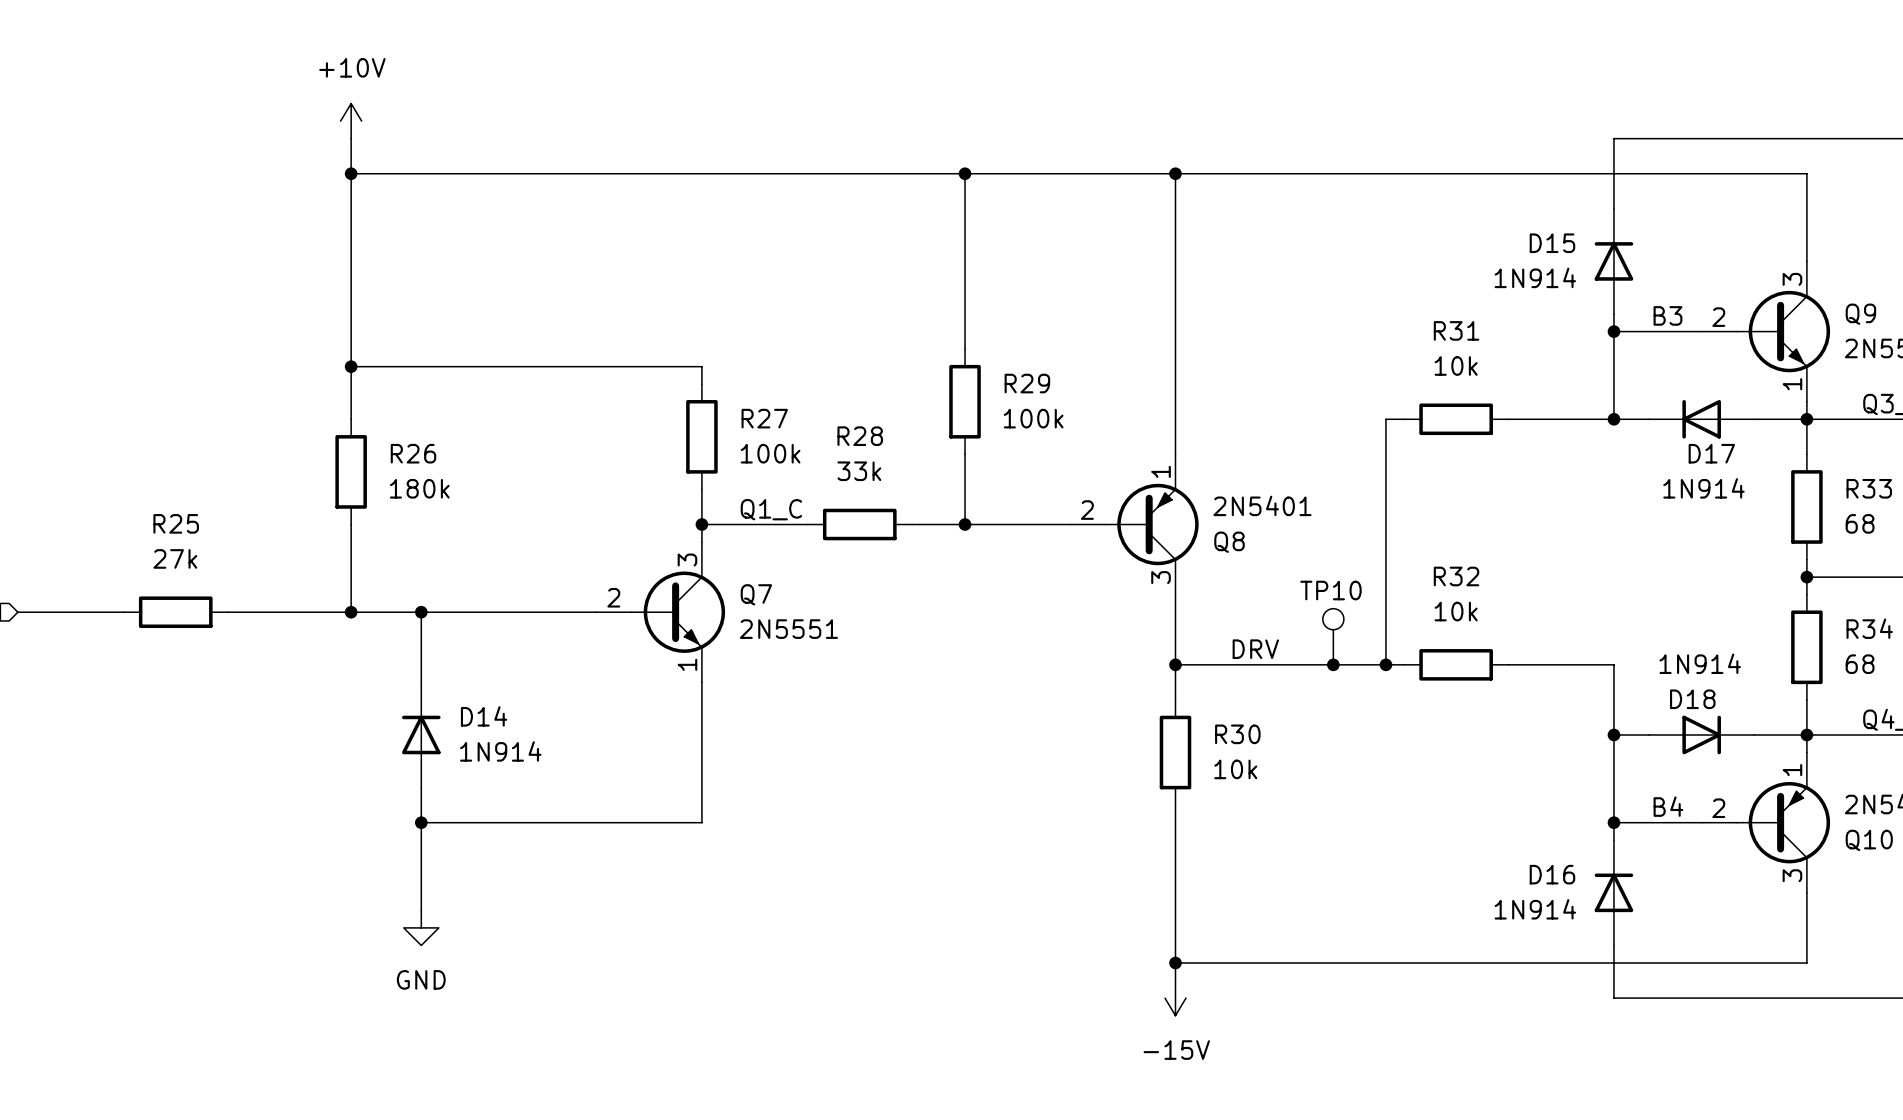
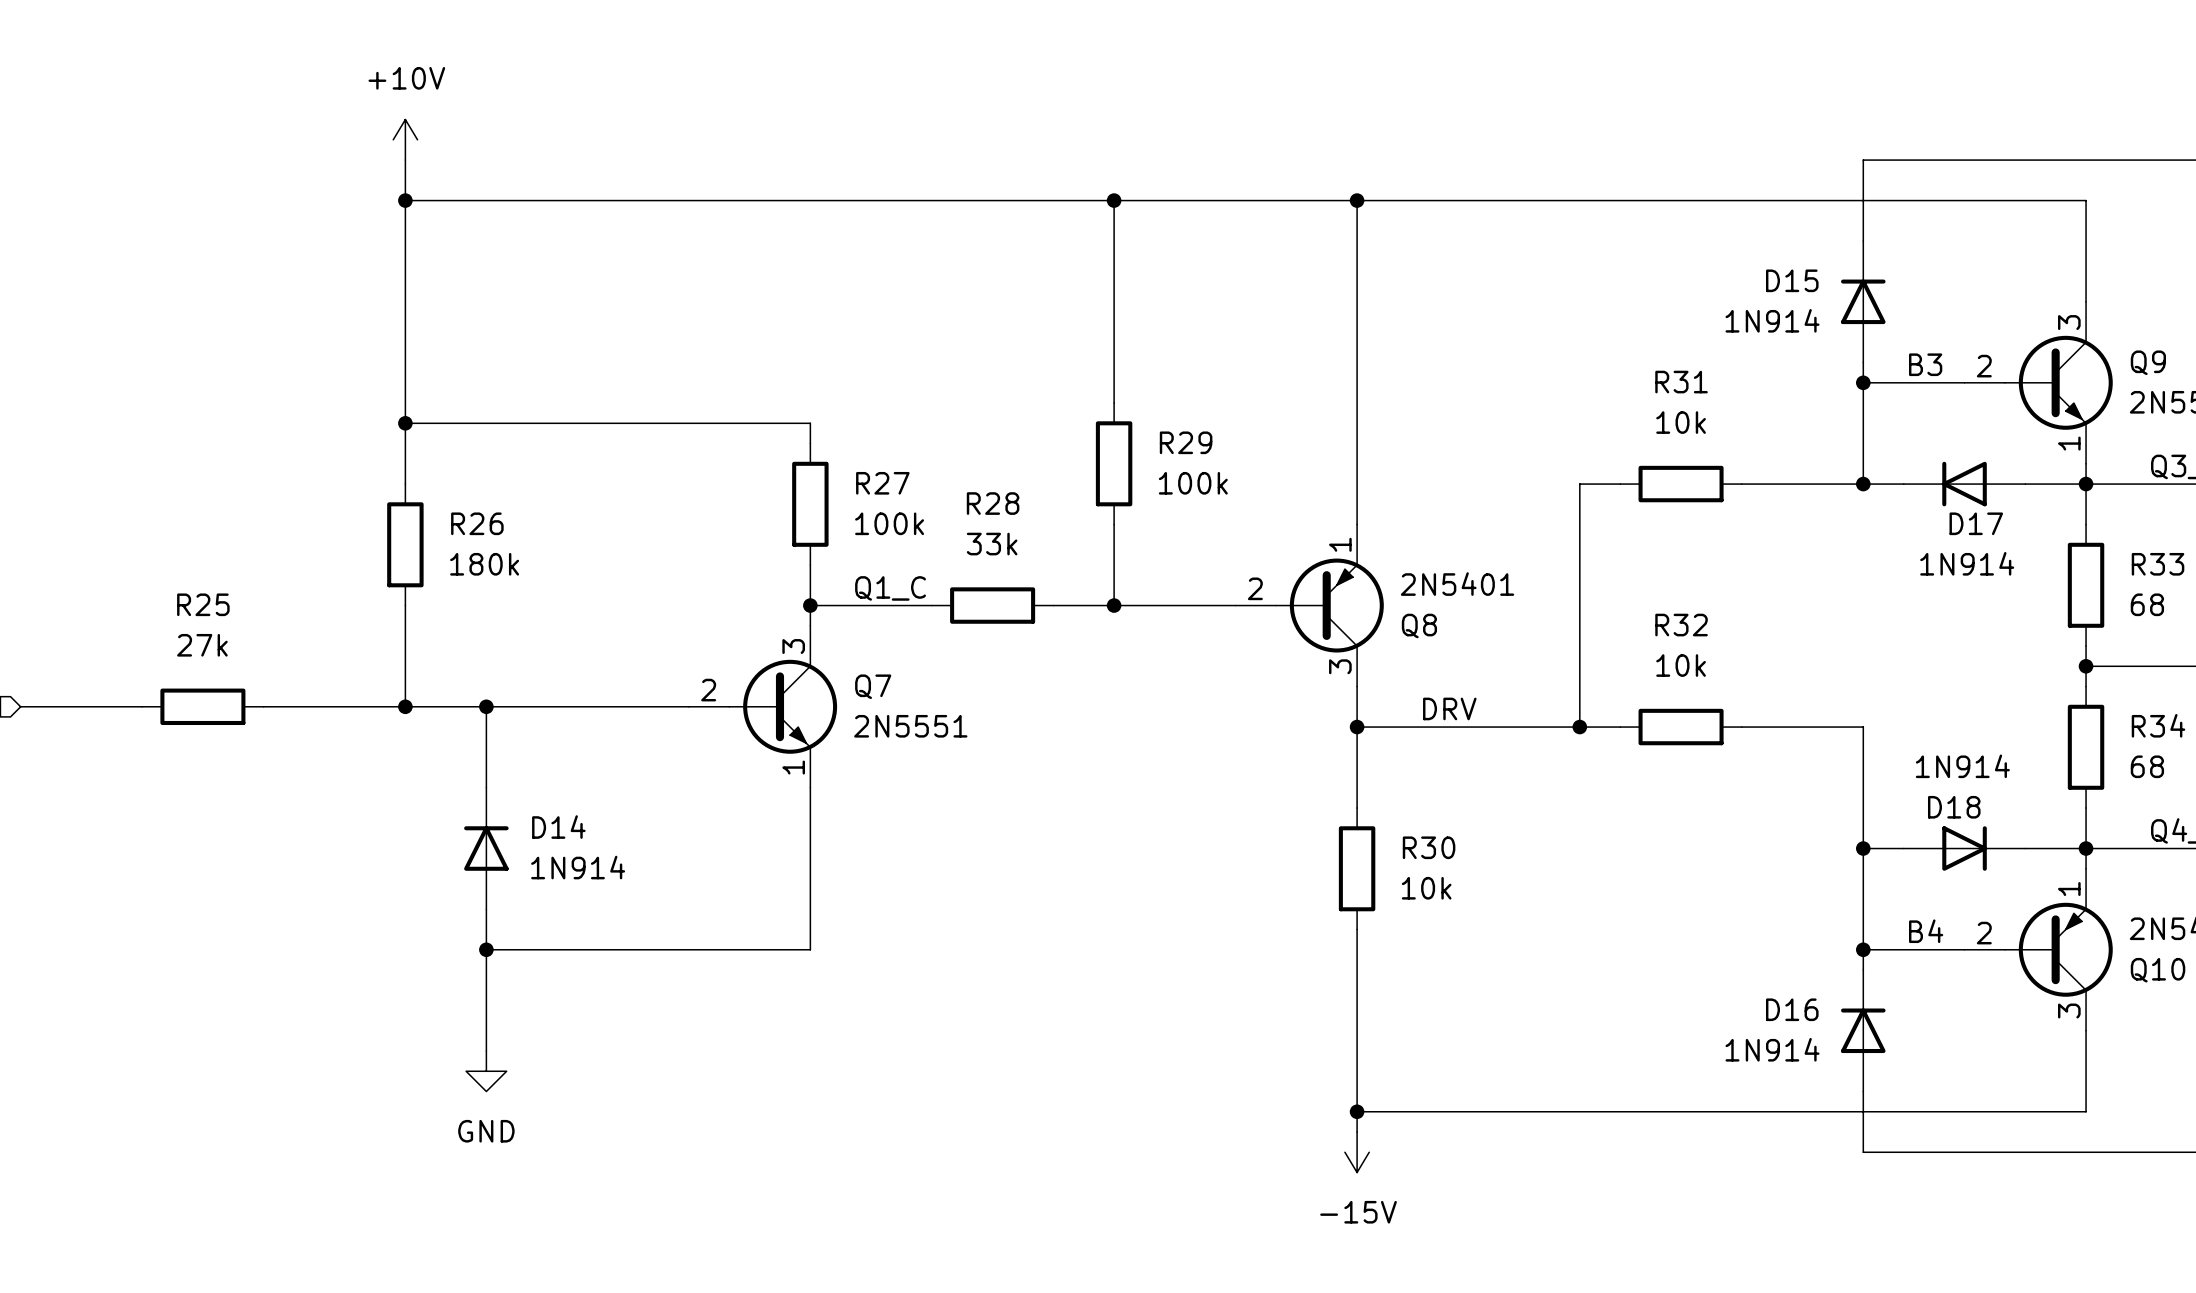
wire: (1385, 419) (1385, 664) -> (1600, 484) (1579, 484) (1579, 727)
junction: none -> (1579, 727)
TP10: (1333, 636) -> none
label position: DRV (1255, 649) -> DRV (1449, 708)
wire: (1175, 664) (1403, 664) -> (1357, 727) (1620, 727)
junction position: (1175, 664) -> (1357, 727)
junction: (1333, 664) -> none
junction: (1385, 664) -> none
R32 position: (1456, 664) -> (1681, 727)
wire: (1508, 664) (1613, 664) -> (1741, 727) (1863, 727) (1863, 767)

